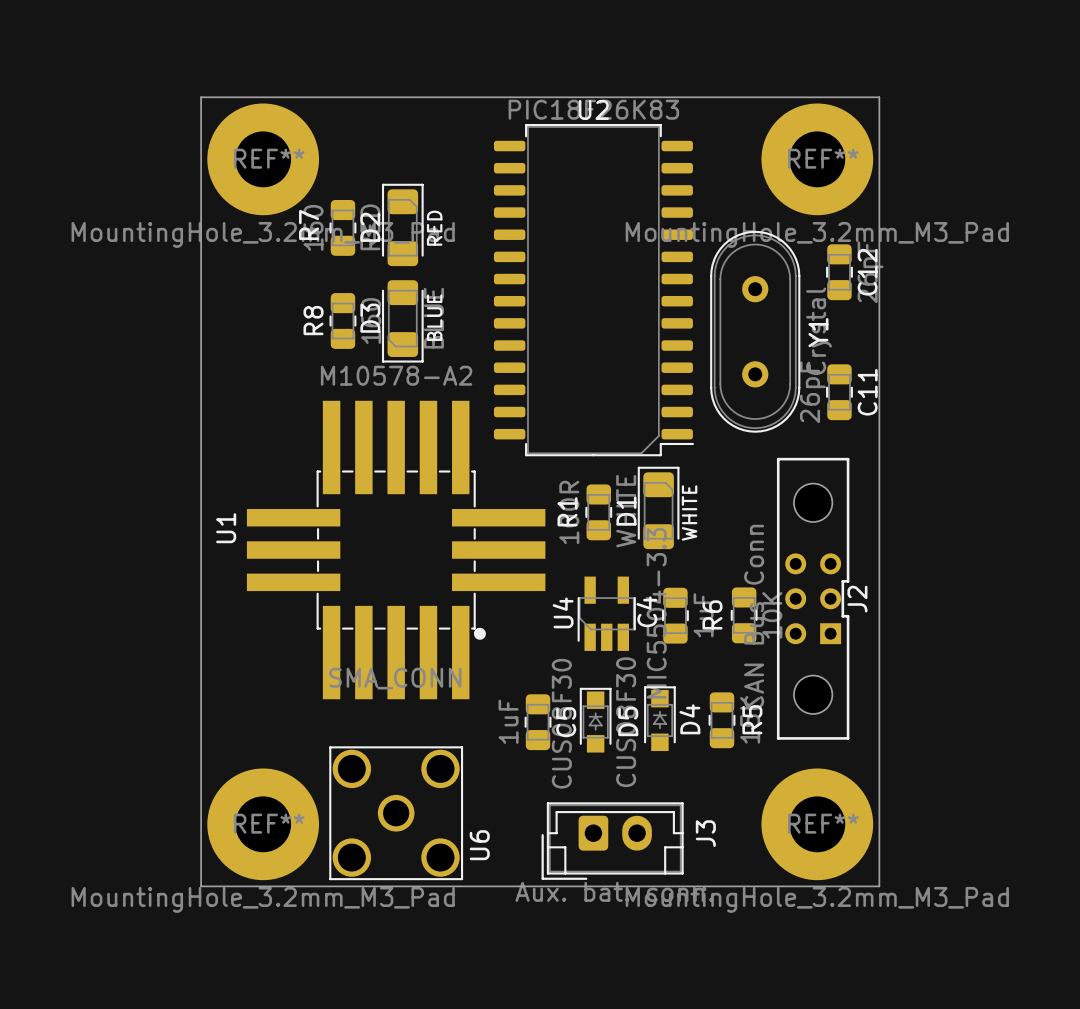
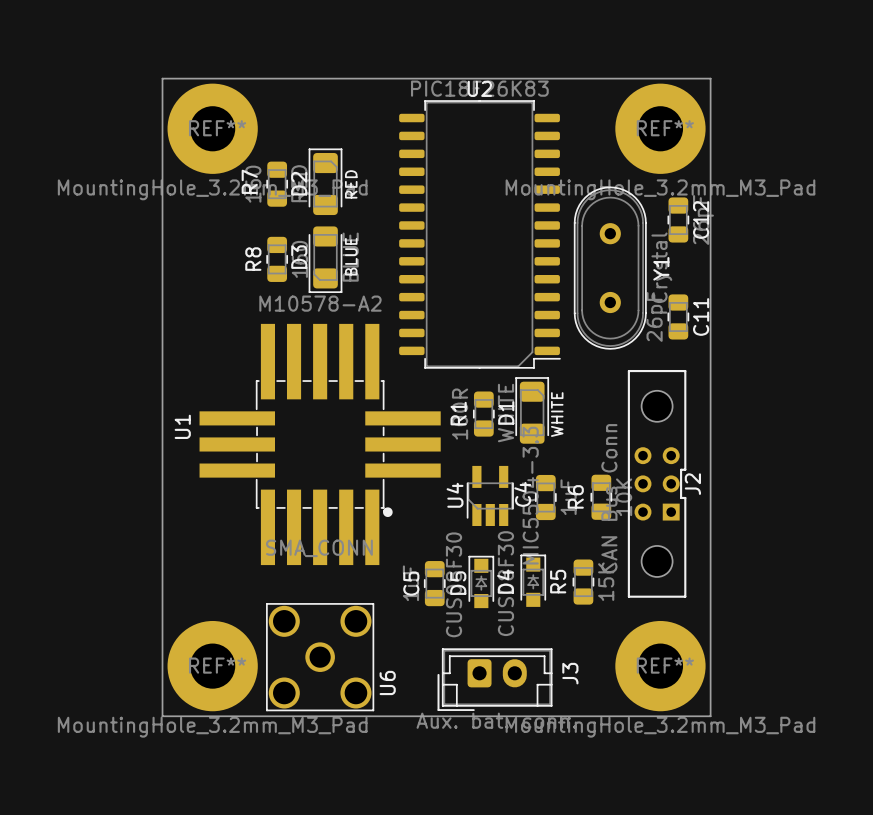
D4 name position: D4 (689, 719) -> D4 (505, 581)
R5 name position: R5 (752, 719) -> R5 (558, 581)
D5 name position: D5 (628, 721) -> D5 (458, 583)
C5 name position: C5 (566, 722) -> C5 (411, 583)

